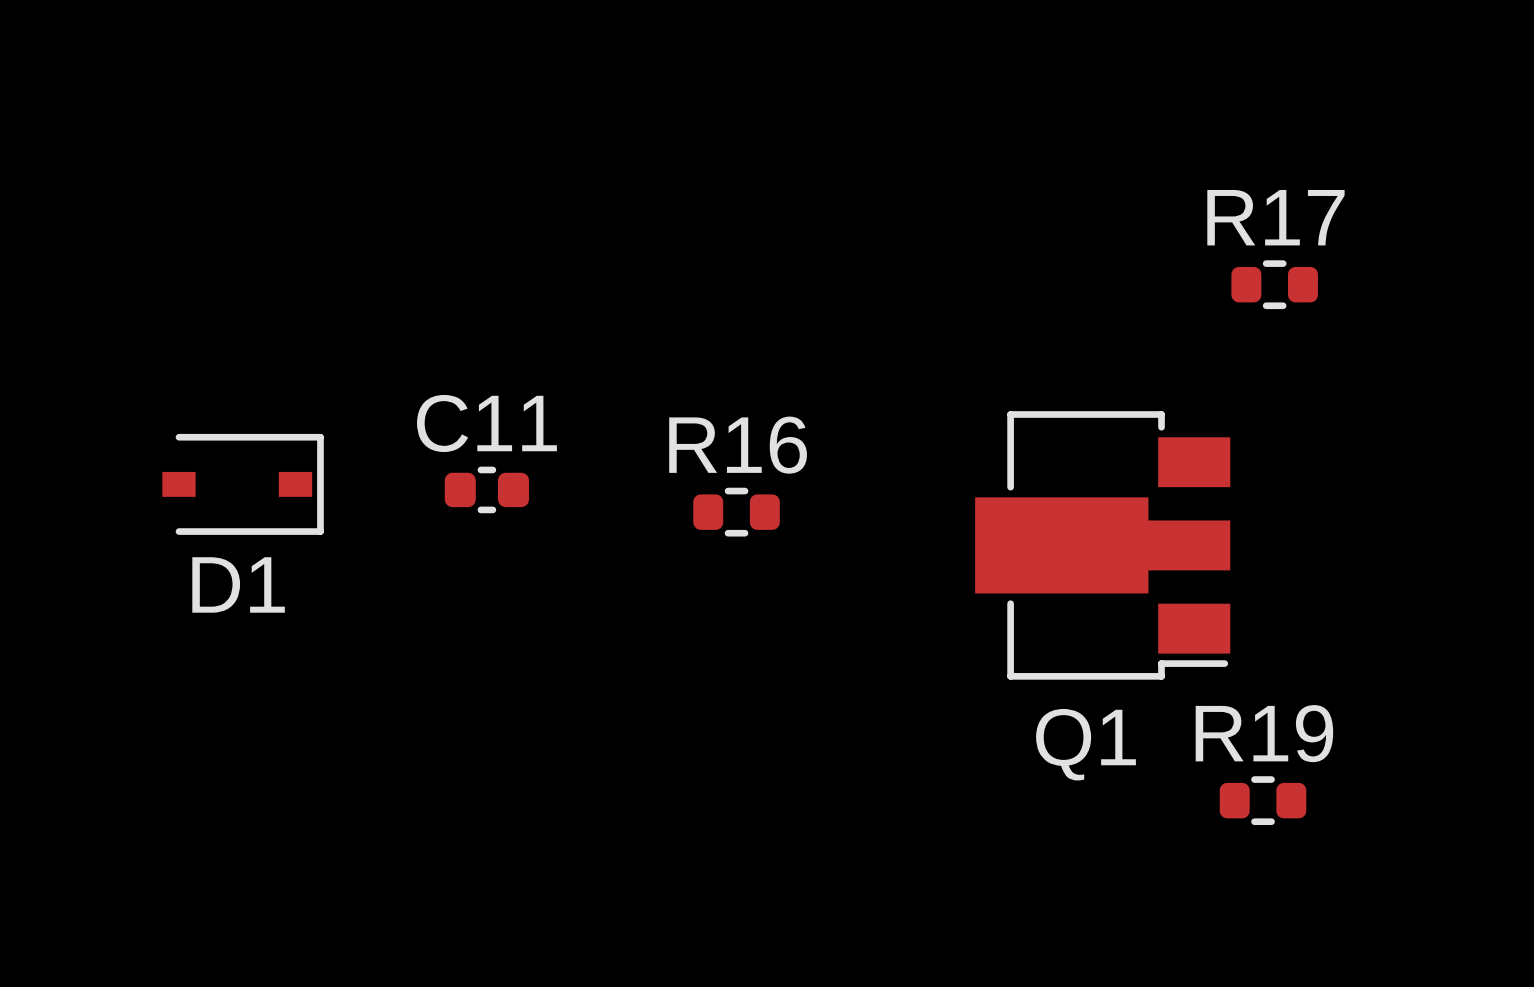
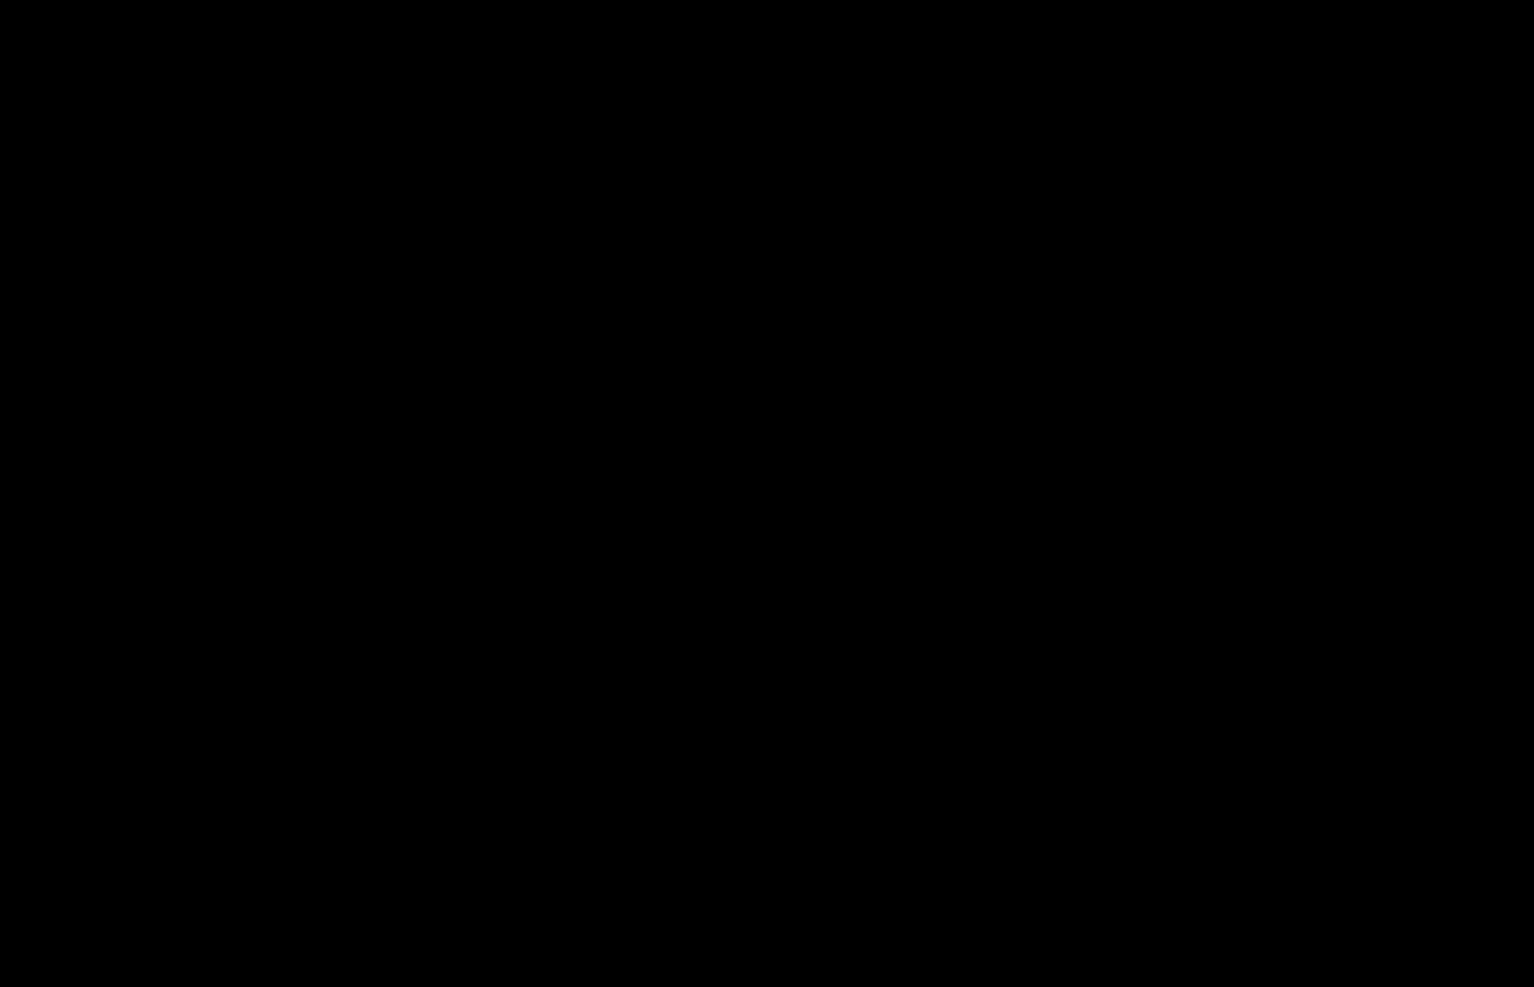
R17: (1274, 284) -> none
D1: (243, 484) -> none
C11: (486, 489) -> none
R16: (736, 512) -> none
Q1: (1102, 545) -> none
R19: (1263, 800) -> none

